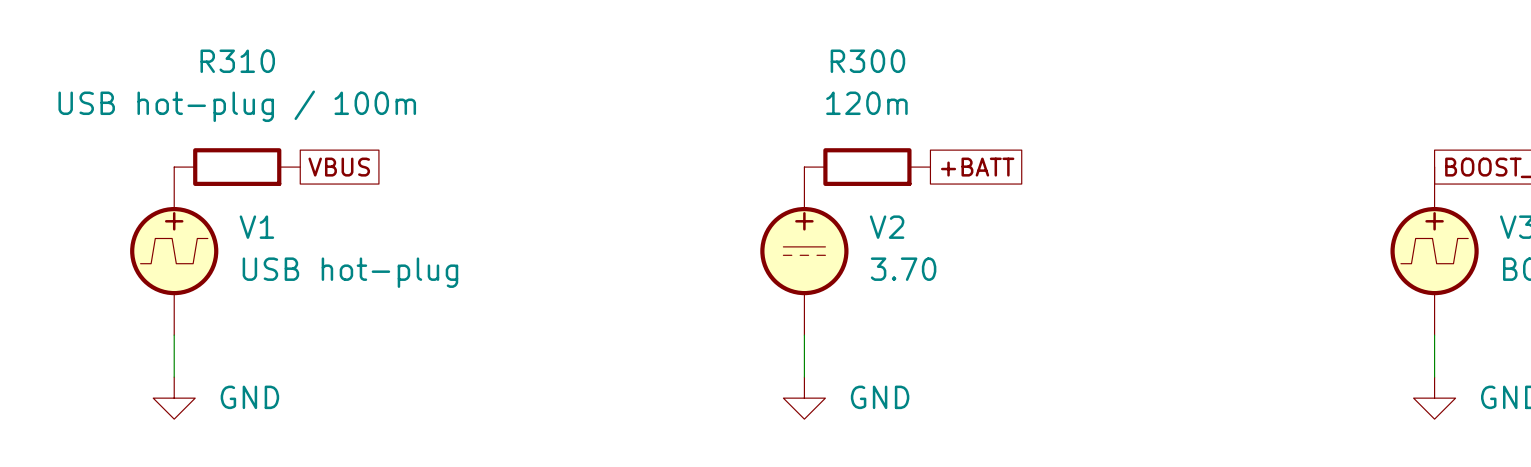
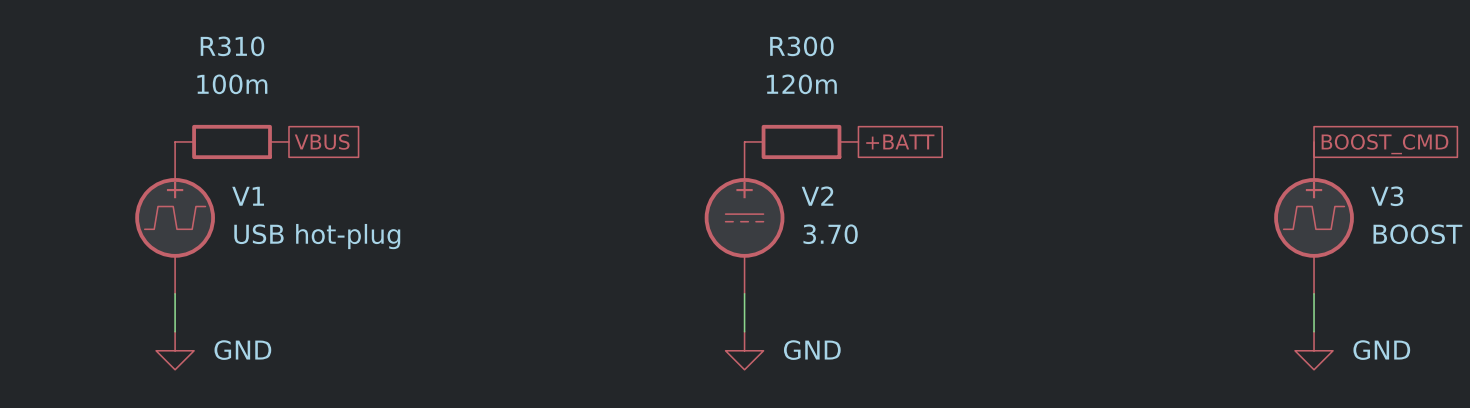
R310 value: USB hot-plug / 100m (237, 106) -> 100m (232, 84)

